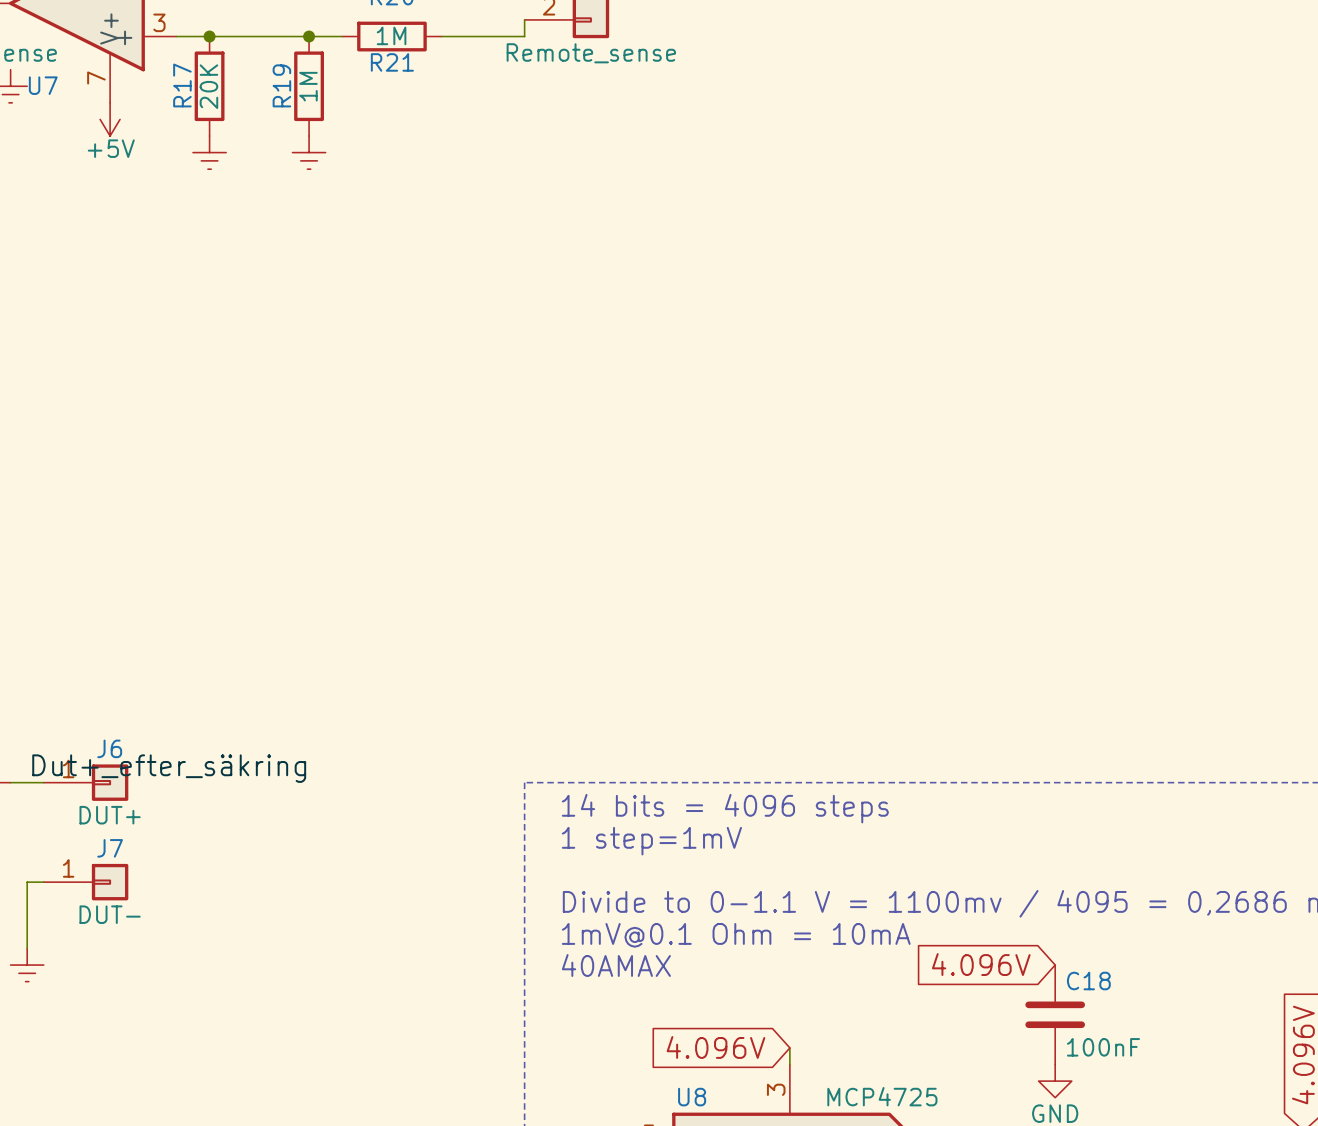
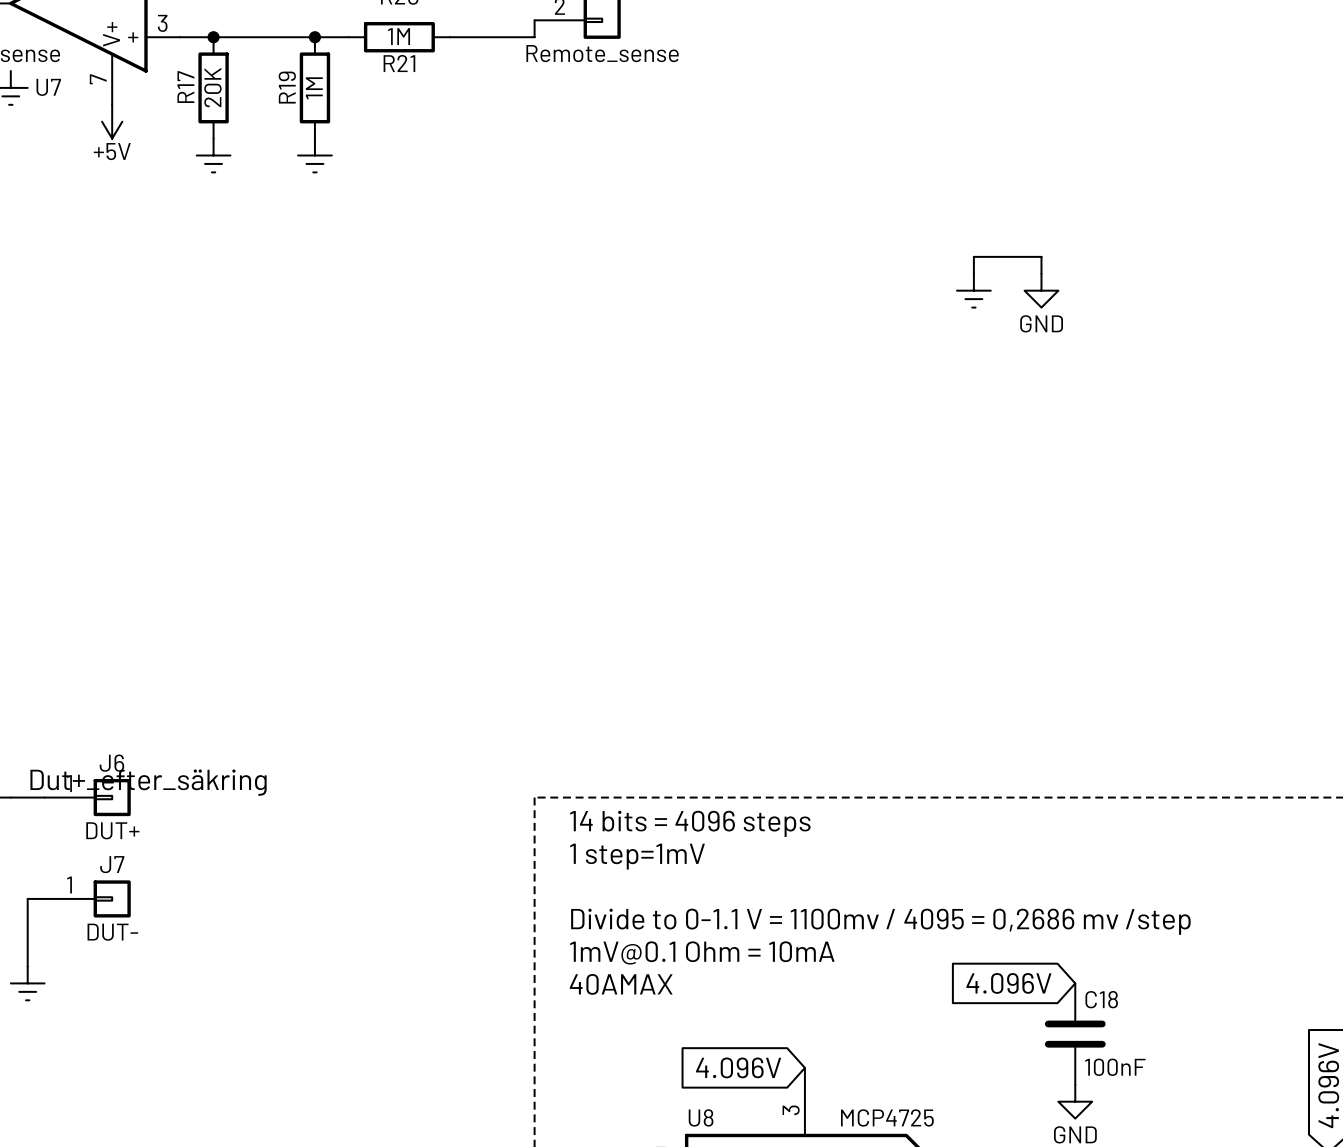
wire: none -> (973, 273) (973, 256) (1041, 256) (1041, 273)
power symbol: none -> (973, 290)
power symbol: none -> GND (1041, 290)

